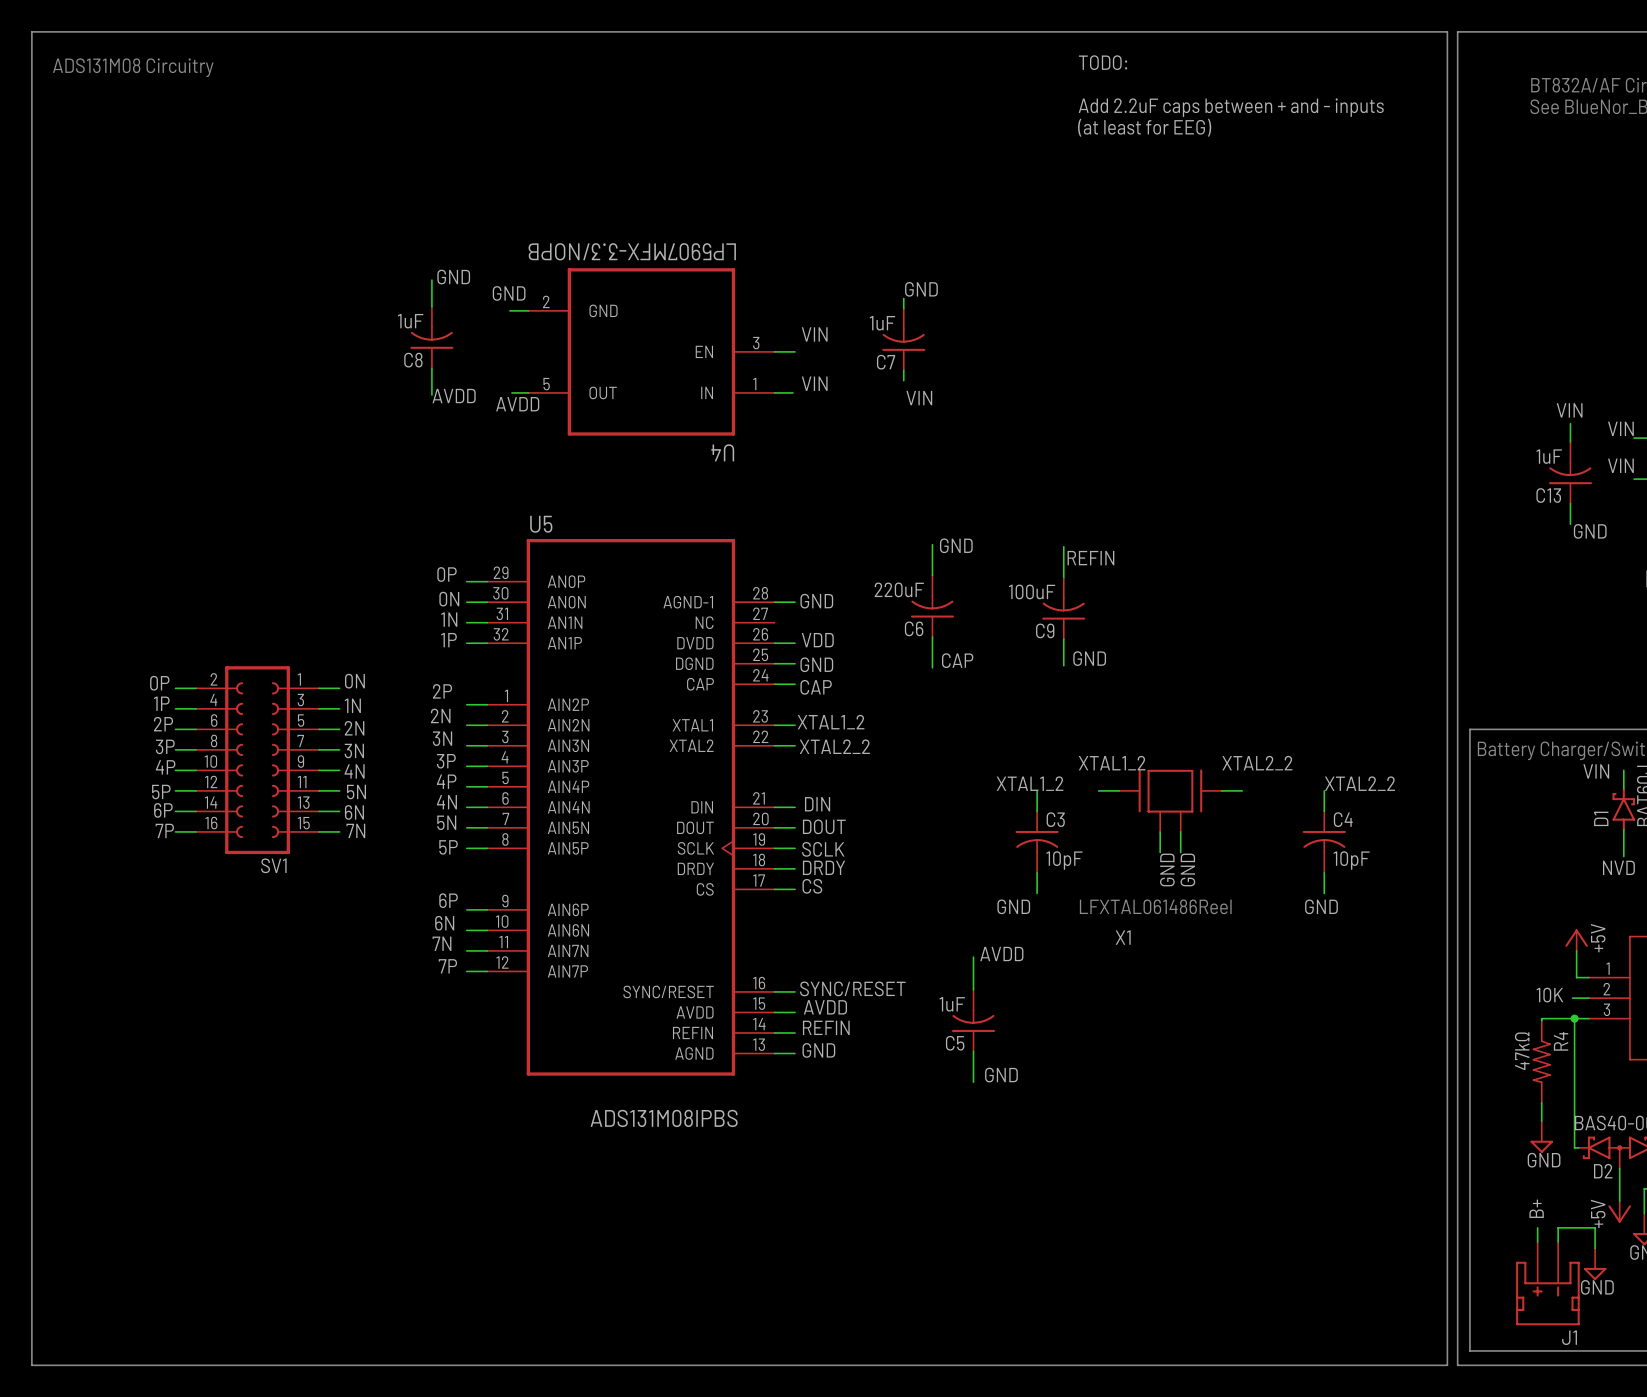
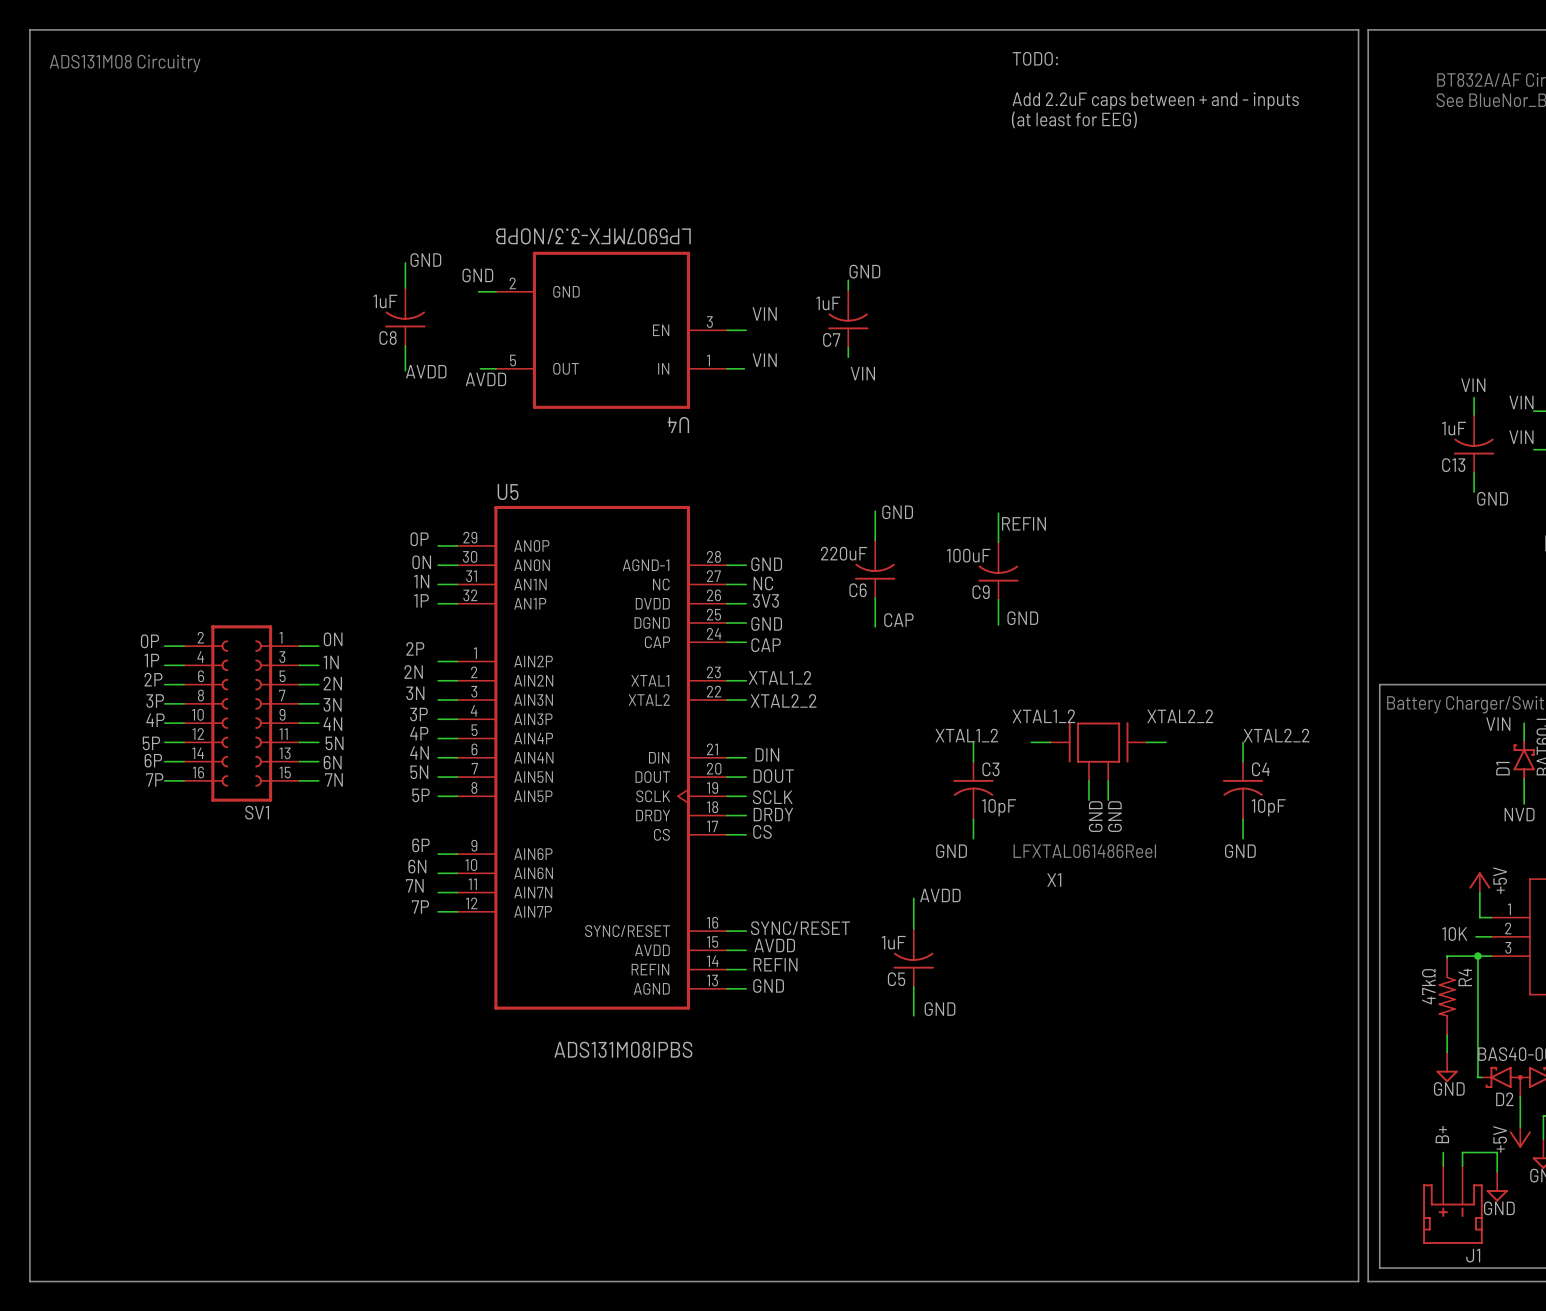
label: none -> NC (763, 583)
wire: none -> (726, 584) (746, 584)
label: VDD (817, 640) -> 3V3 (765, 600)

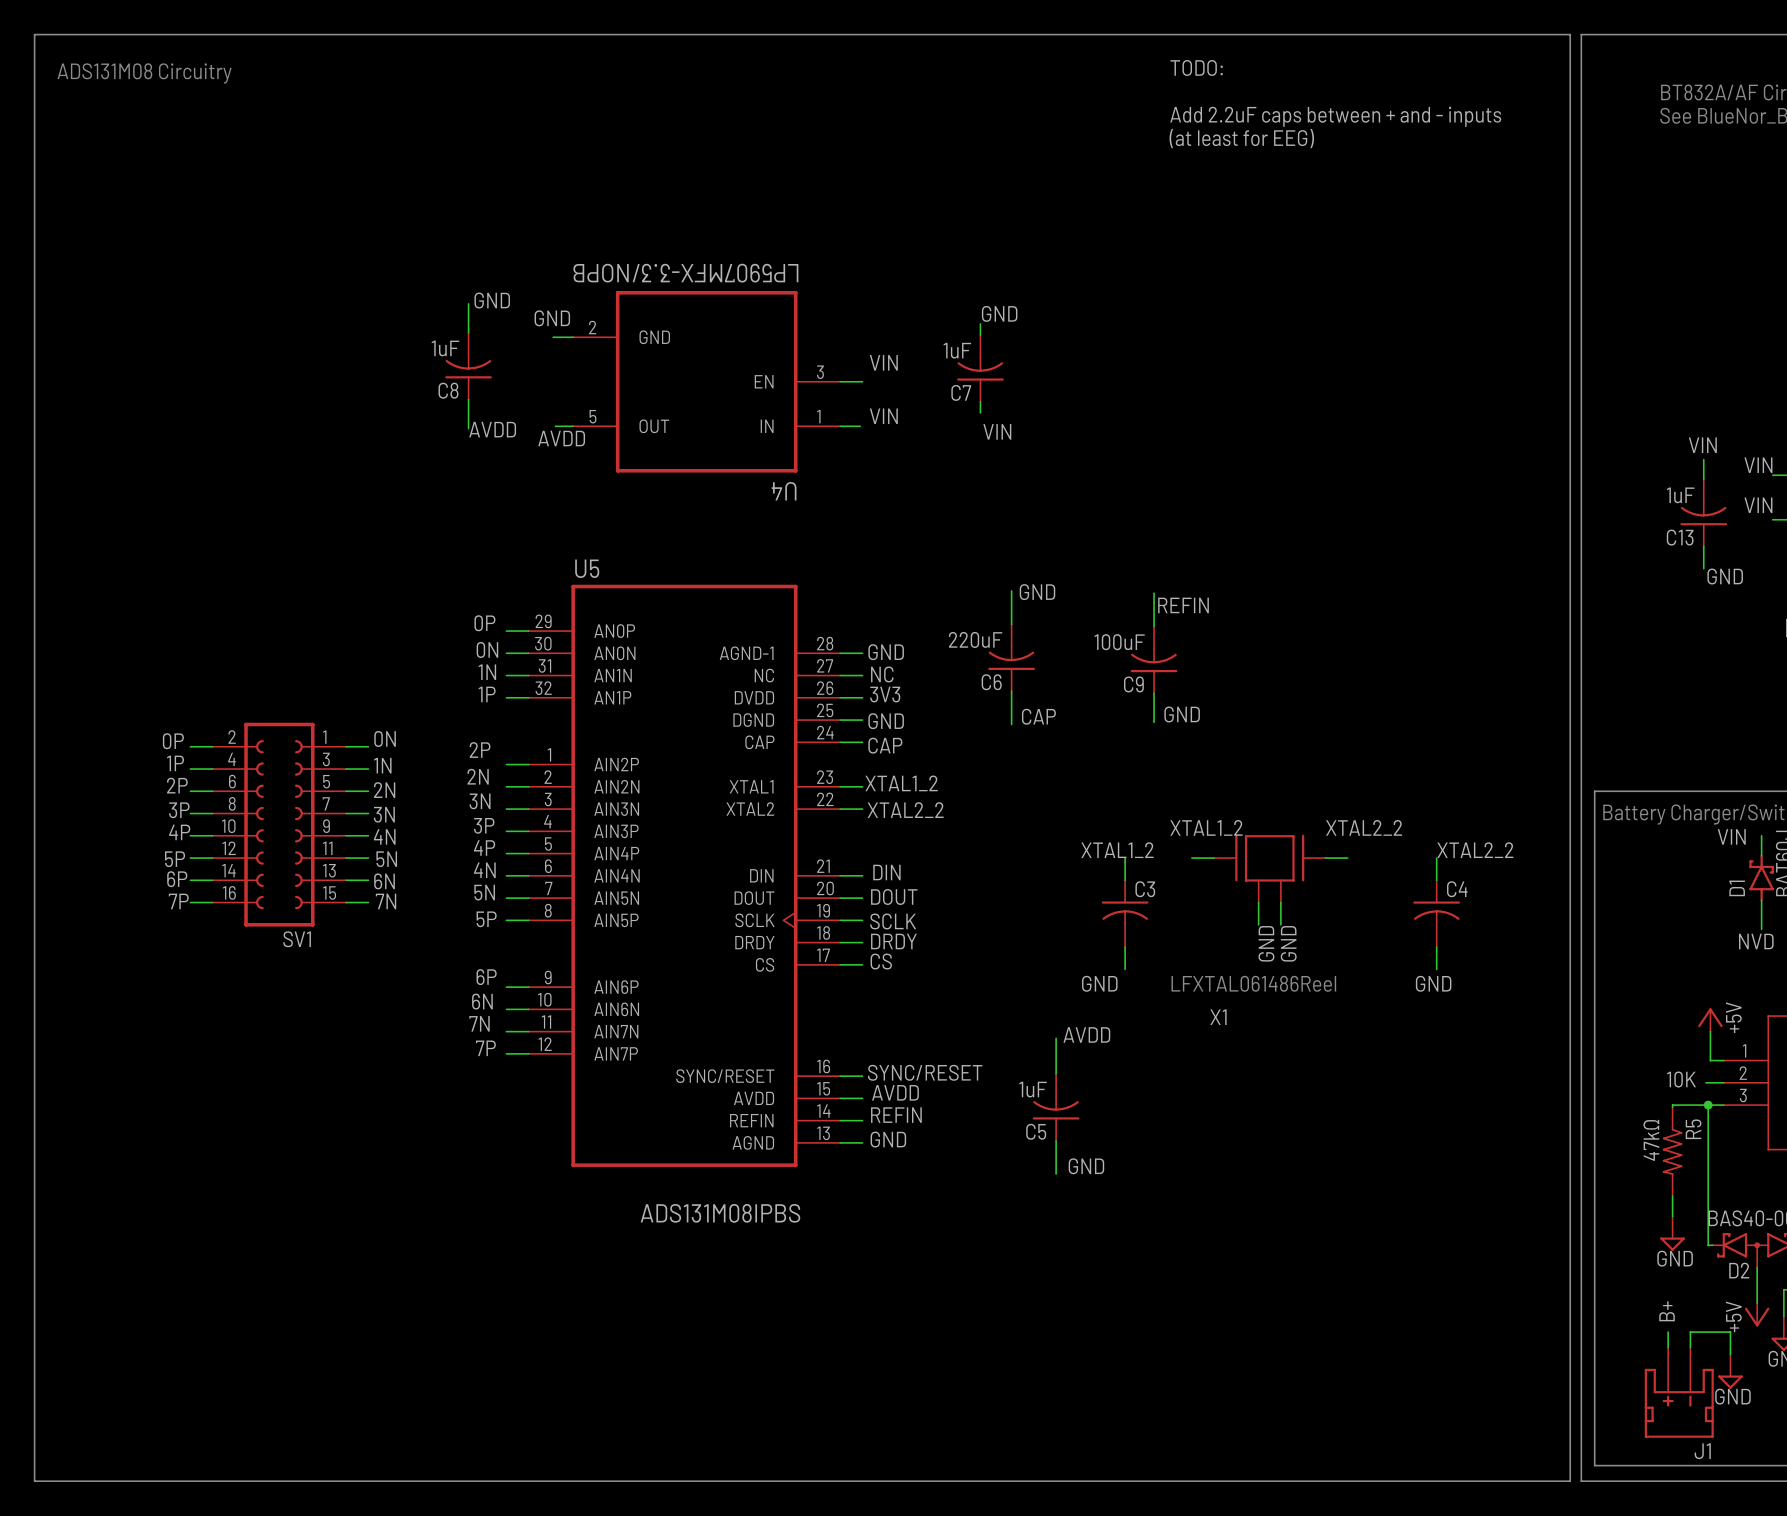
C3 value: 10pF (999, 807) -> none
C4 value: 10pF (1268, 807) -> none
R4 name: R4 (1465, 977) -> R5 (1693, 1129)

